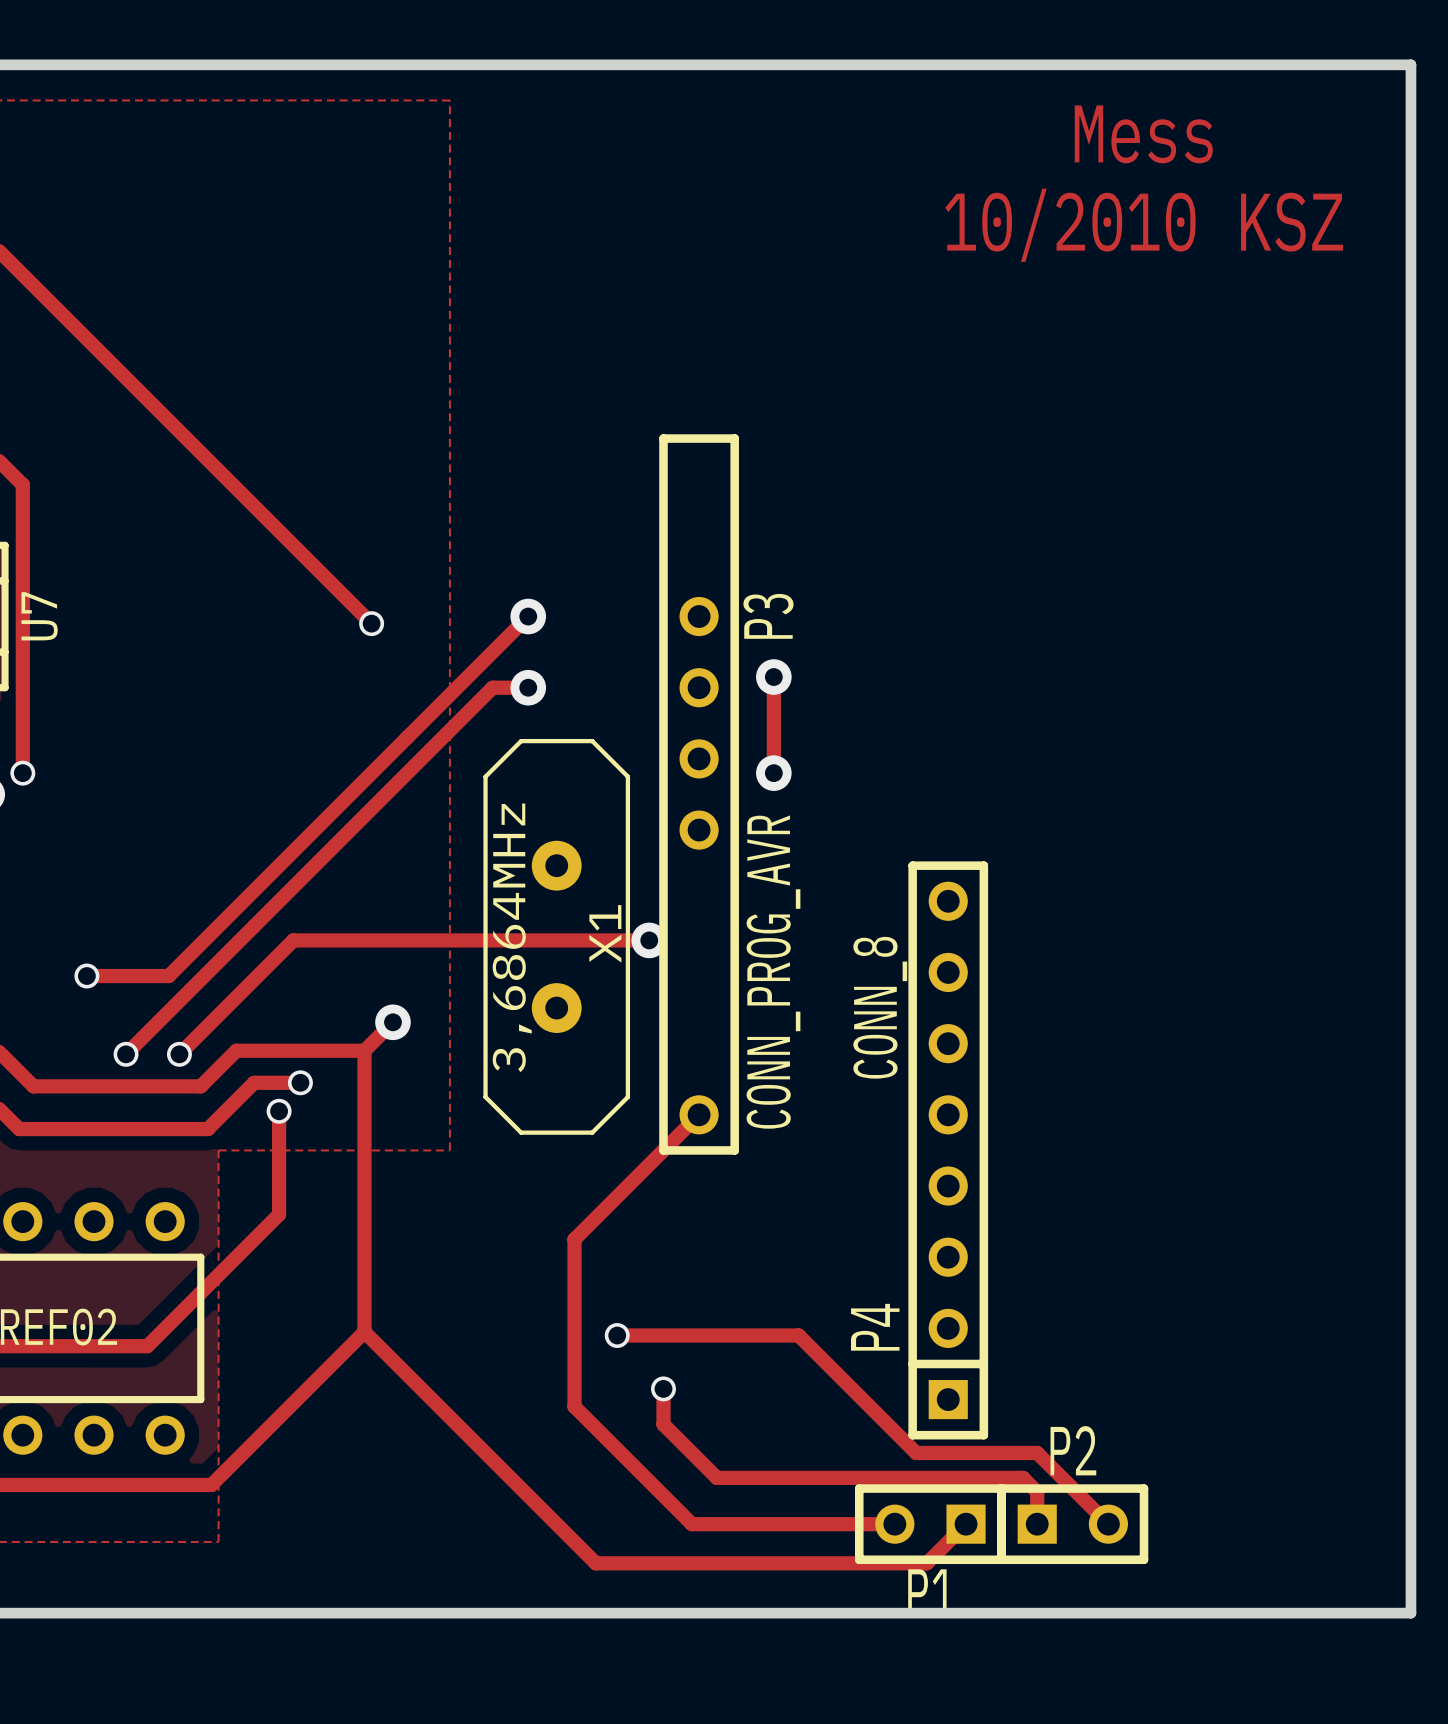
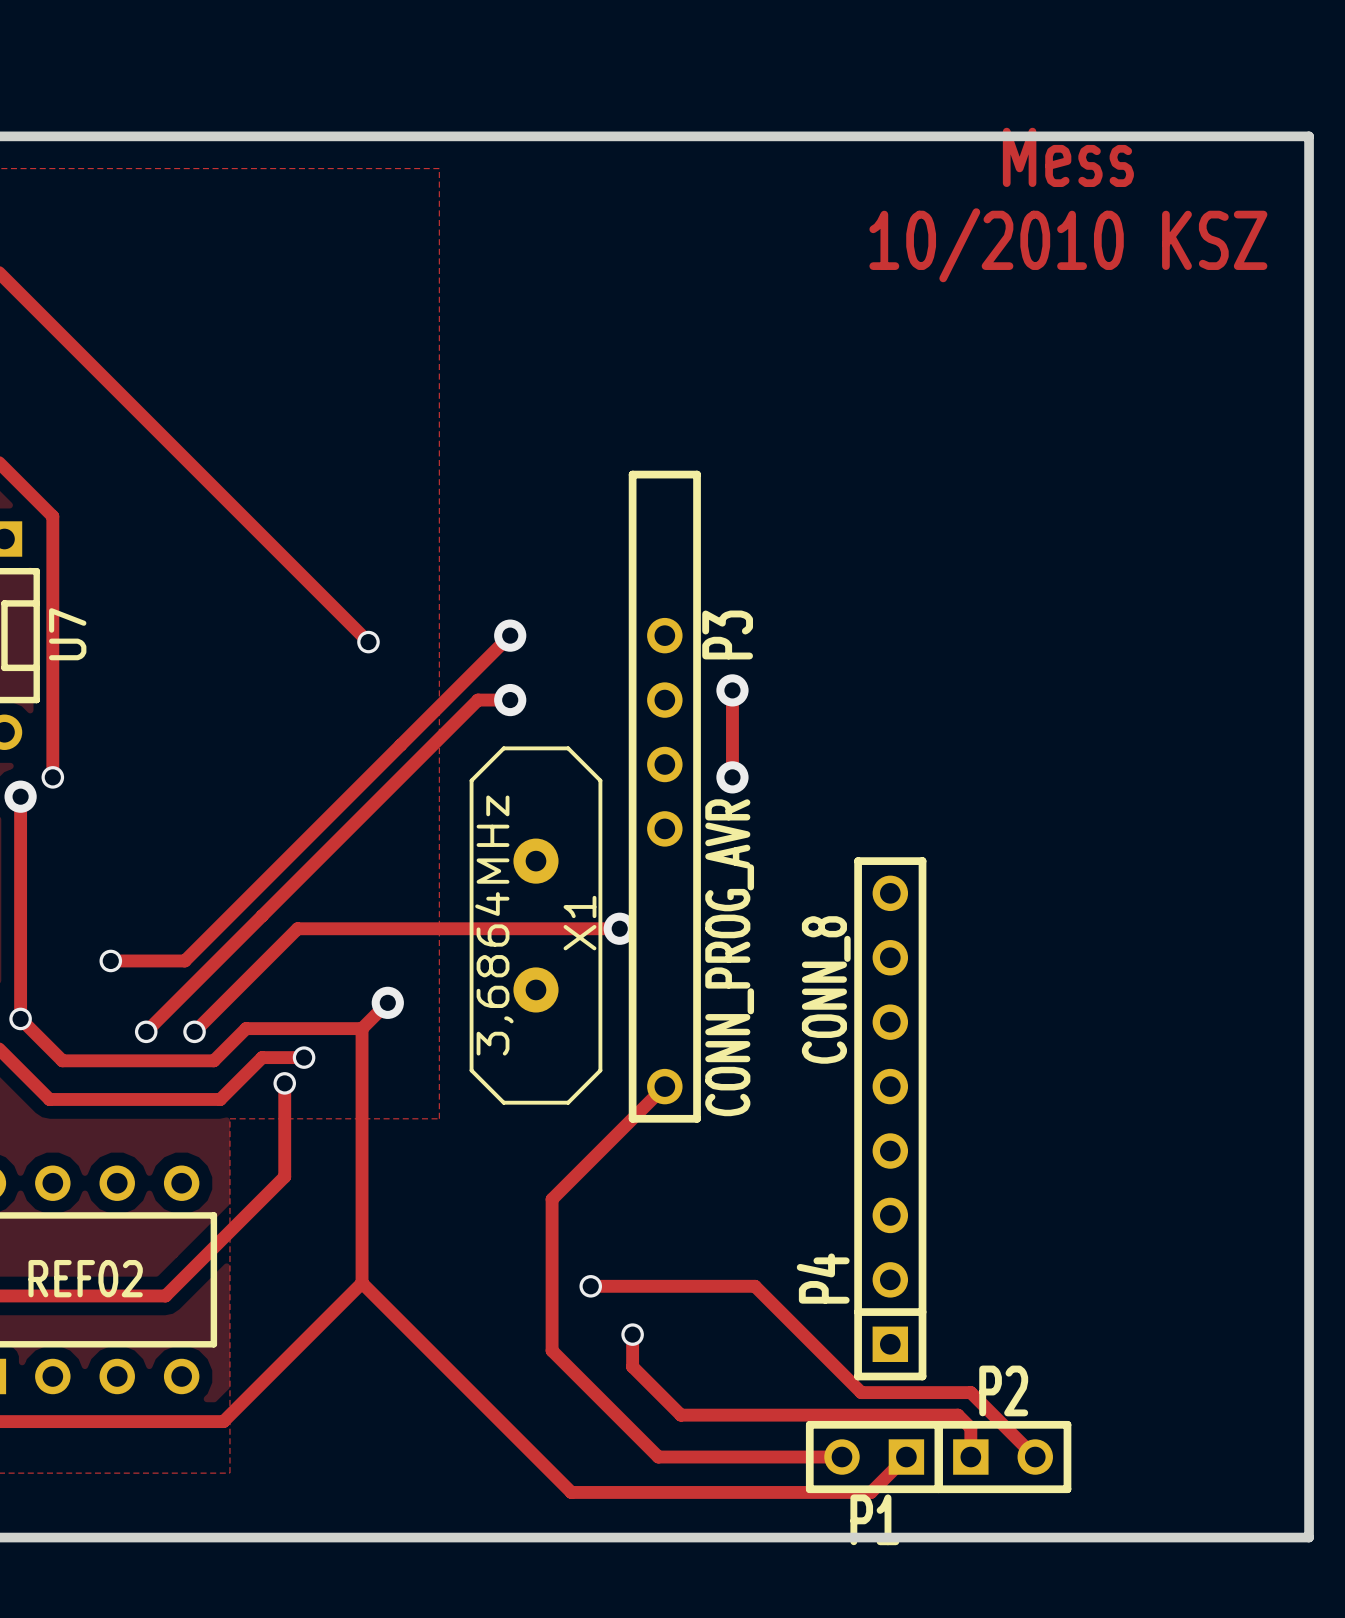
text position: Mess (1143, 134) -> Mess (1068, 157)
text position: 10/2010 KSZ (1144, 225) -> 10/2010 KSZ (1068, 245)

